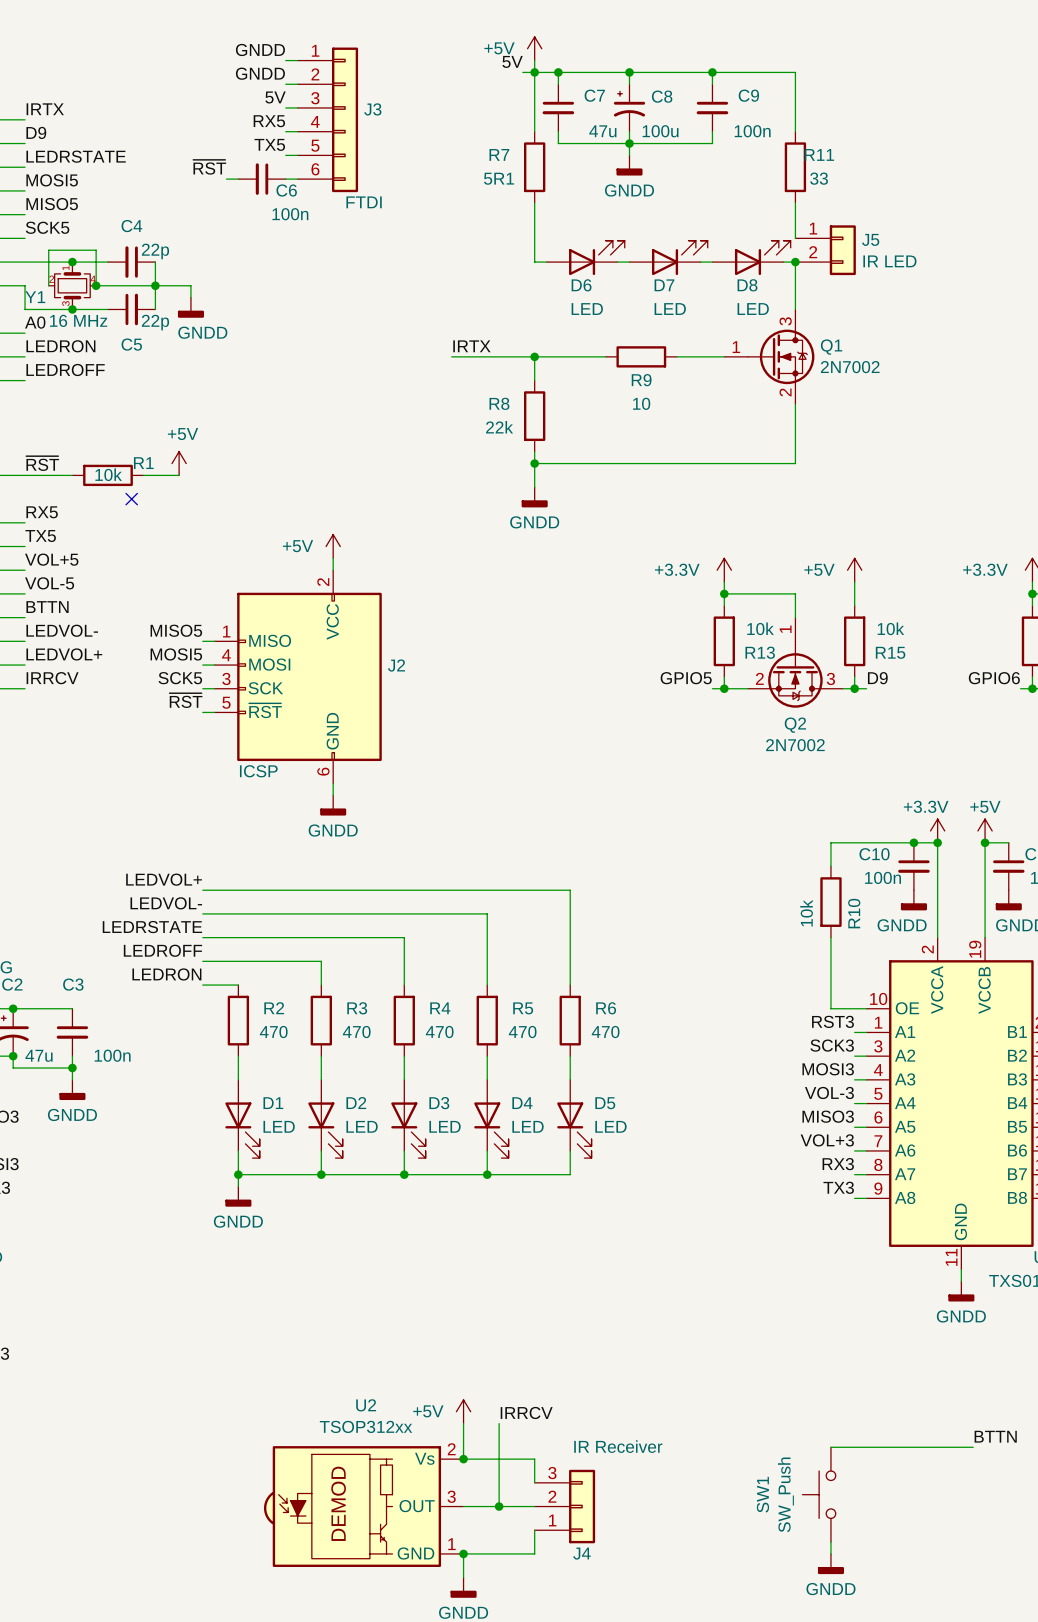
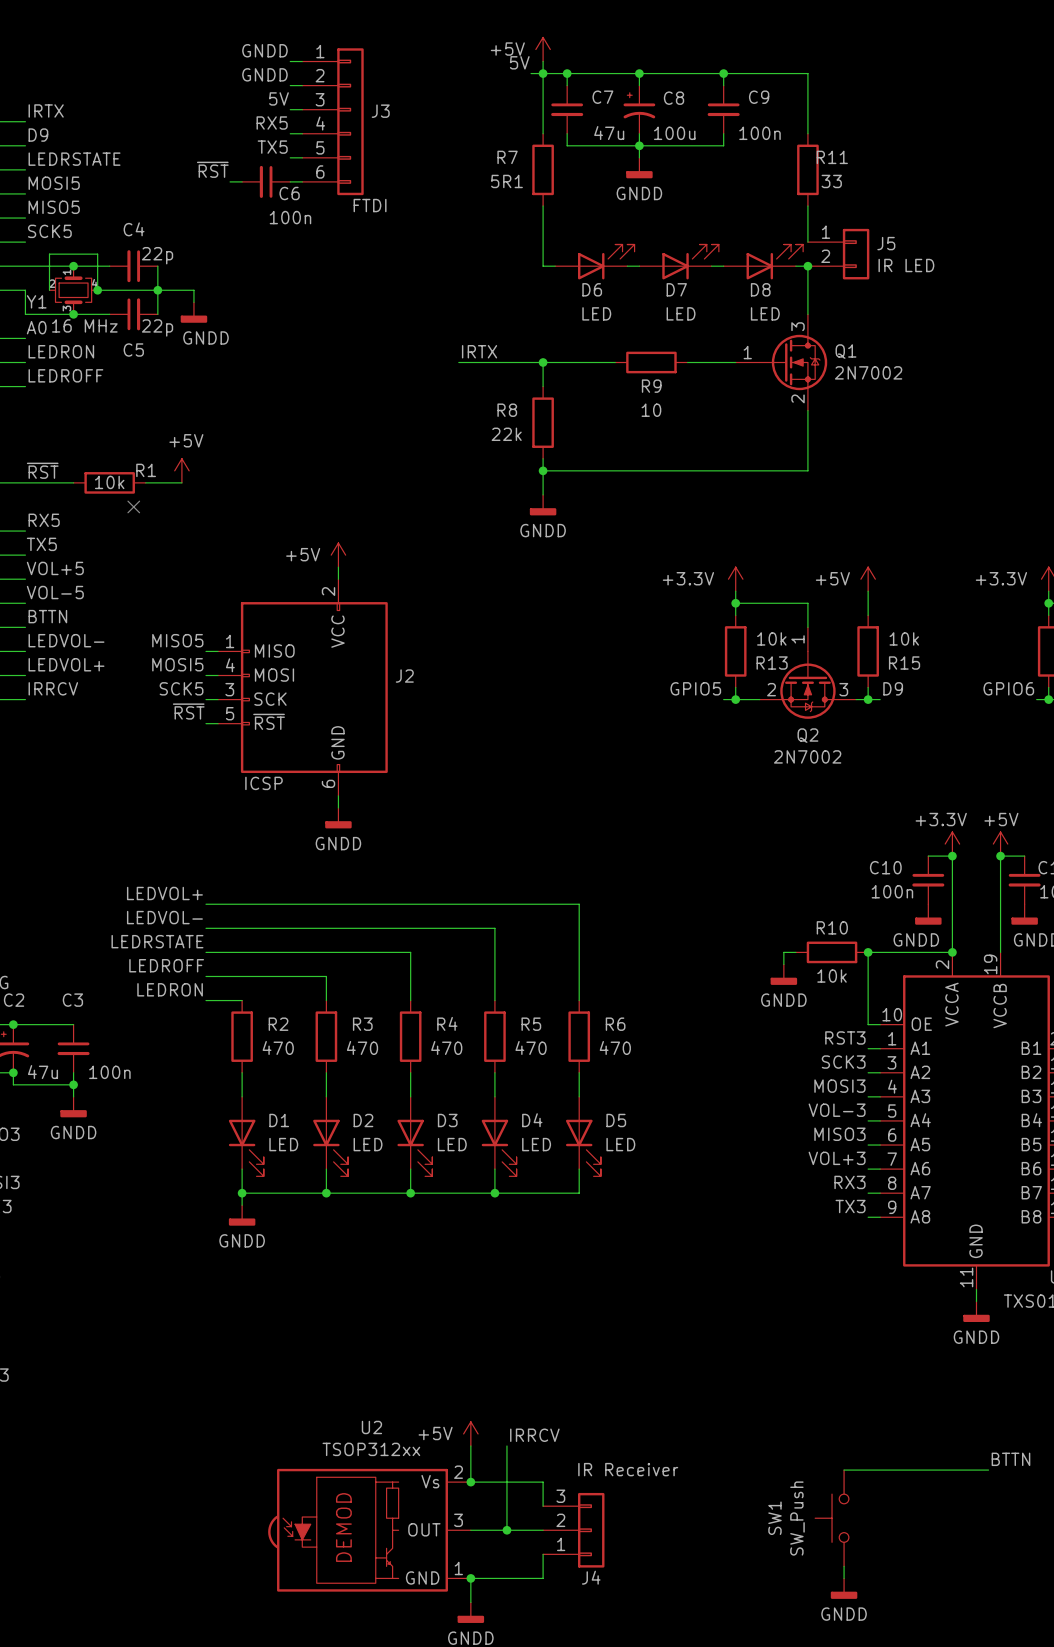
wire: (913, 842) (830, 842) (830, 866) -> none
junction: (913, 842) -> none
R10 rotation: 0° (830, 902) -> 90° clockwise (832, 952)
R10 value position: 10k (806, 913) -> 10k (832, 976)
R10 name position: R10 (854, 913) -> R10 (832, 927)
wire: none -> (795, 952) (783, 952) (783, 964)
wire: (830, 937) (830, 1008) (854, 1008) -> (952, 952) (868, 952) (868, 1024)
junction: none -> (868, 952)
junction: none -> (952, 952)
power symbol: none -> GNDD (783, 974)

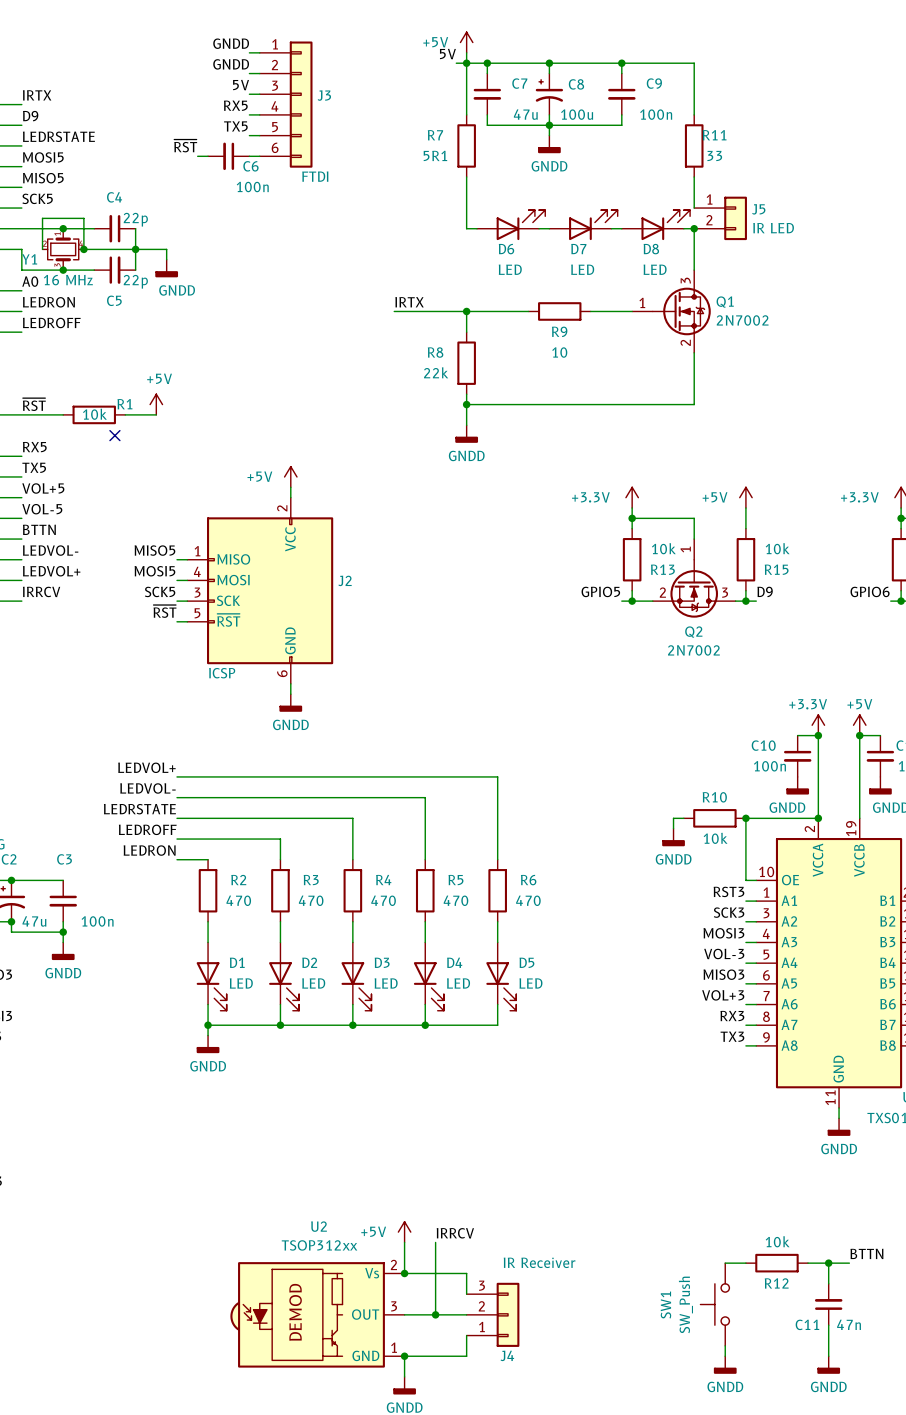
wire: (868, 1470) (940, 1470) -> none
R12: none -> 10k (776, 1263)
wire: none -> (828, 1263) (828, 1283)
junction: none -> (828, 1263)
C11: none -> 47n (828, 1304)
wire: none -> (828, 1325) (828, 1356)
power symbol: none -> GNDD (828, 1365)

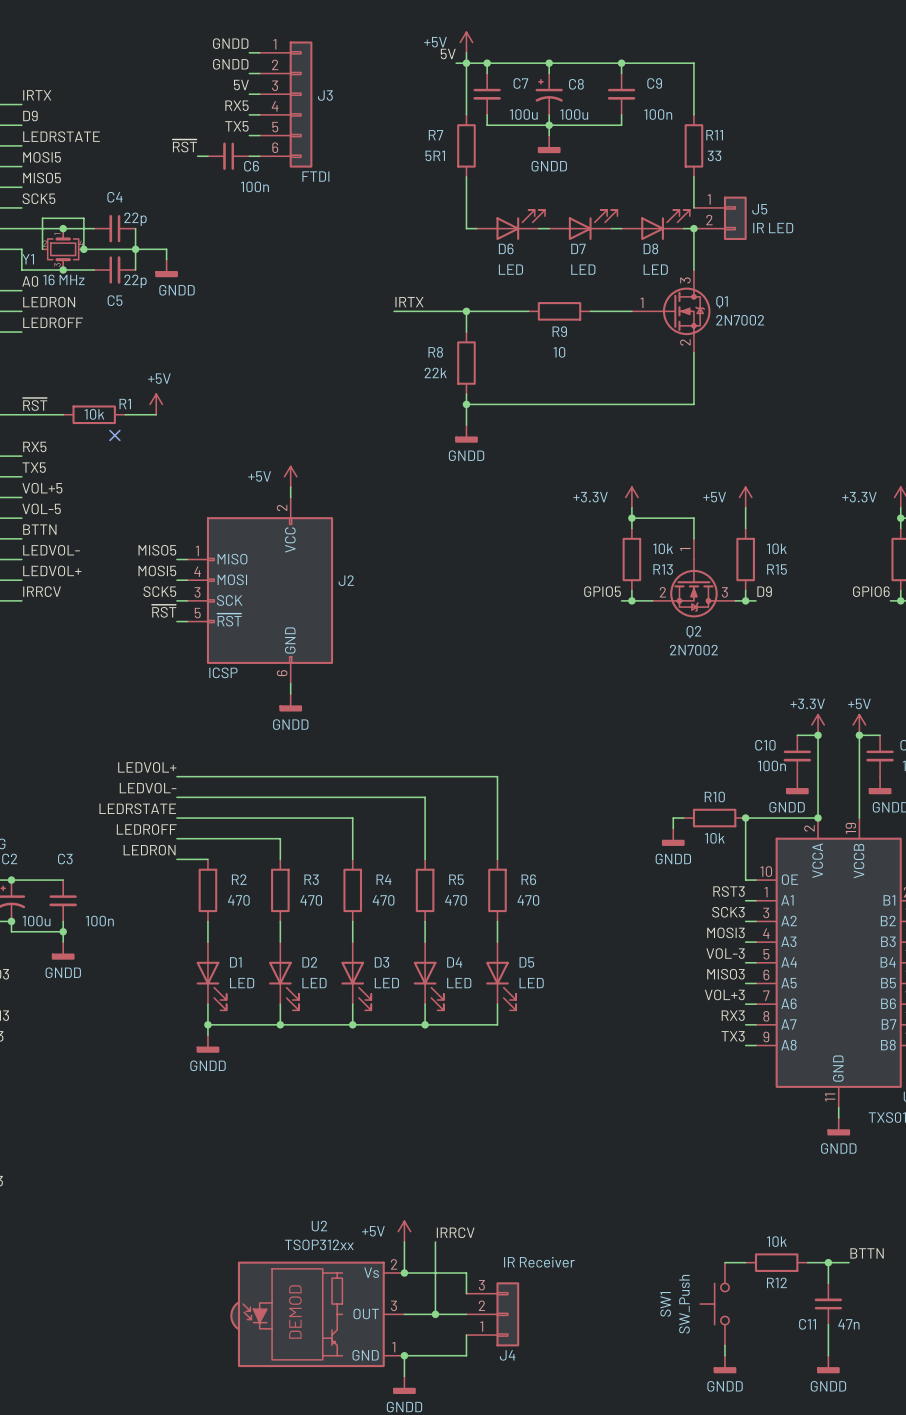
C7 value: 47u (525, 114) -> 100u (523, 114)
C2 value: 47u (34, 921) -> 100u (36, 921)

